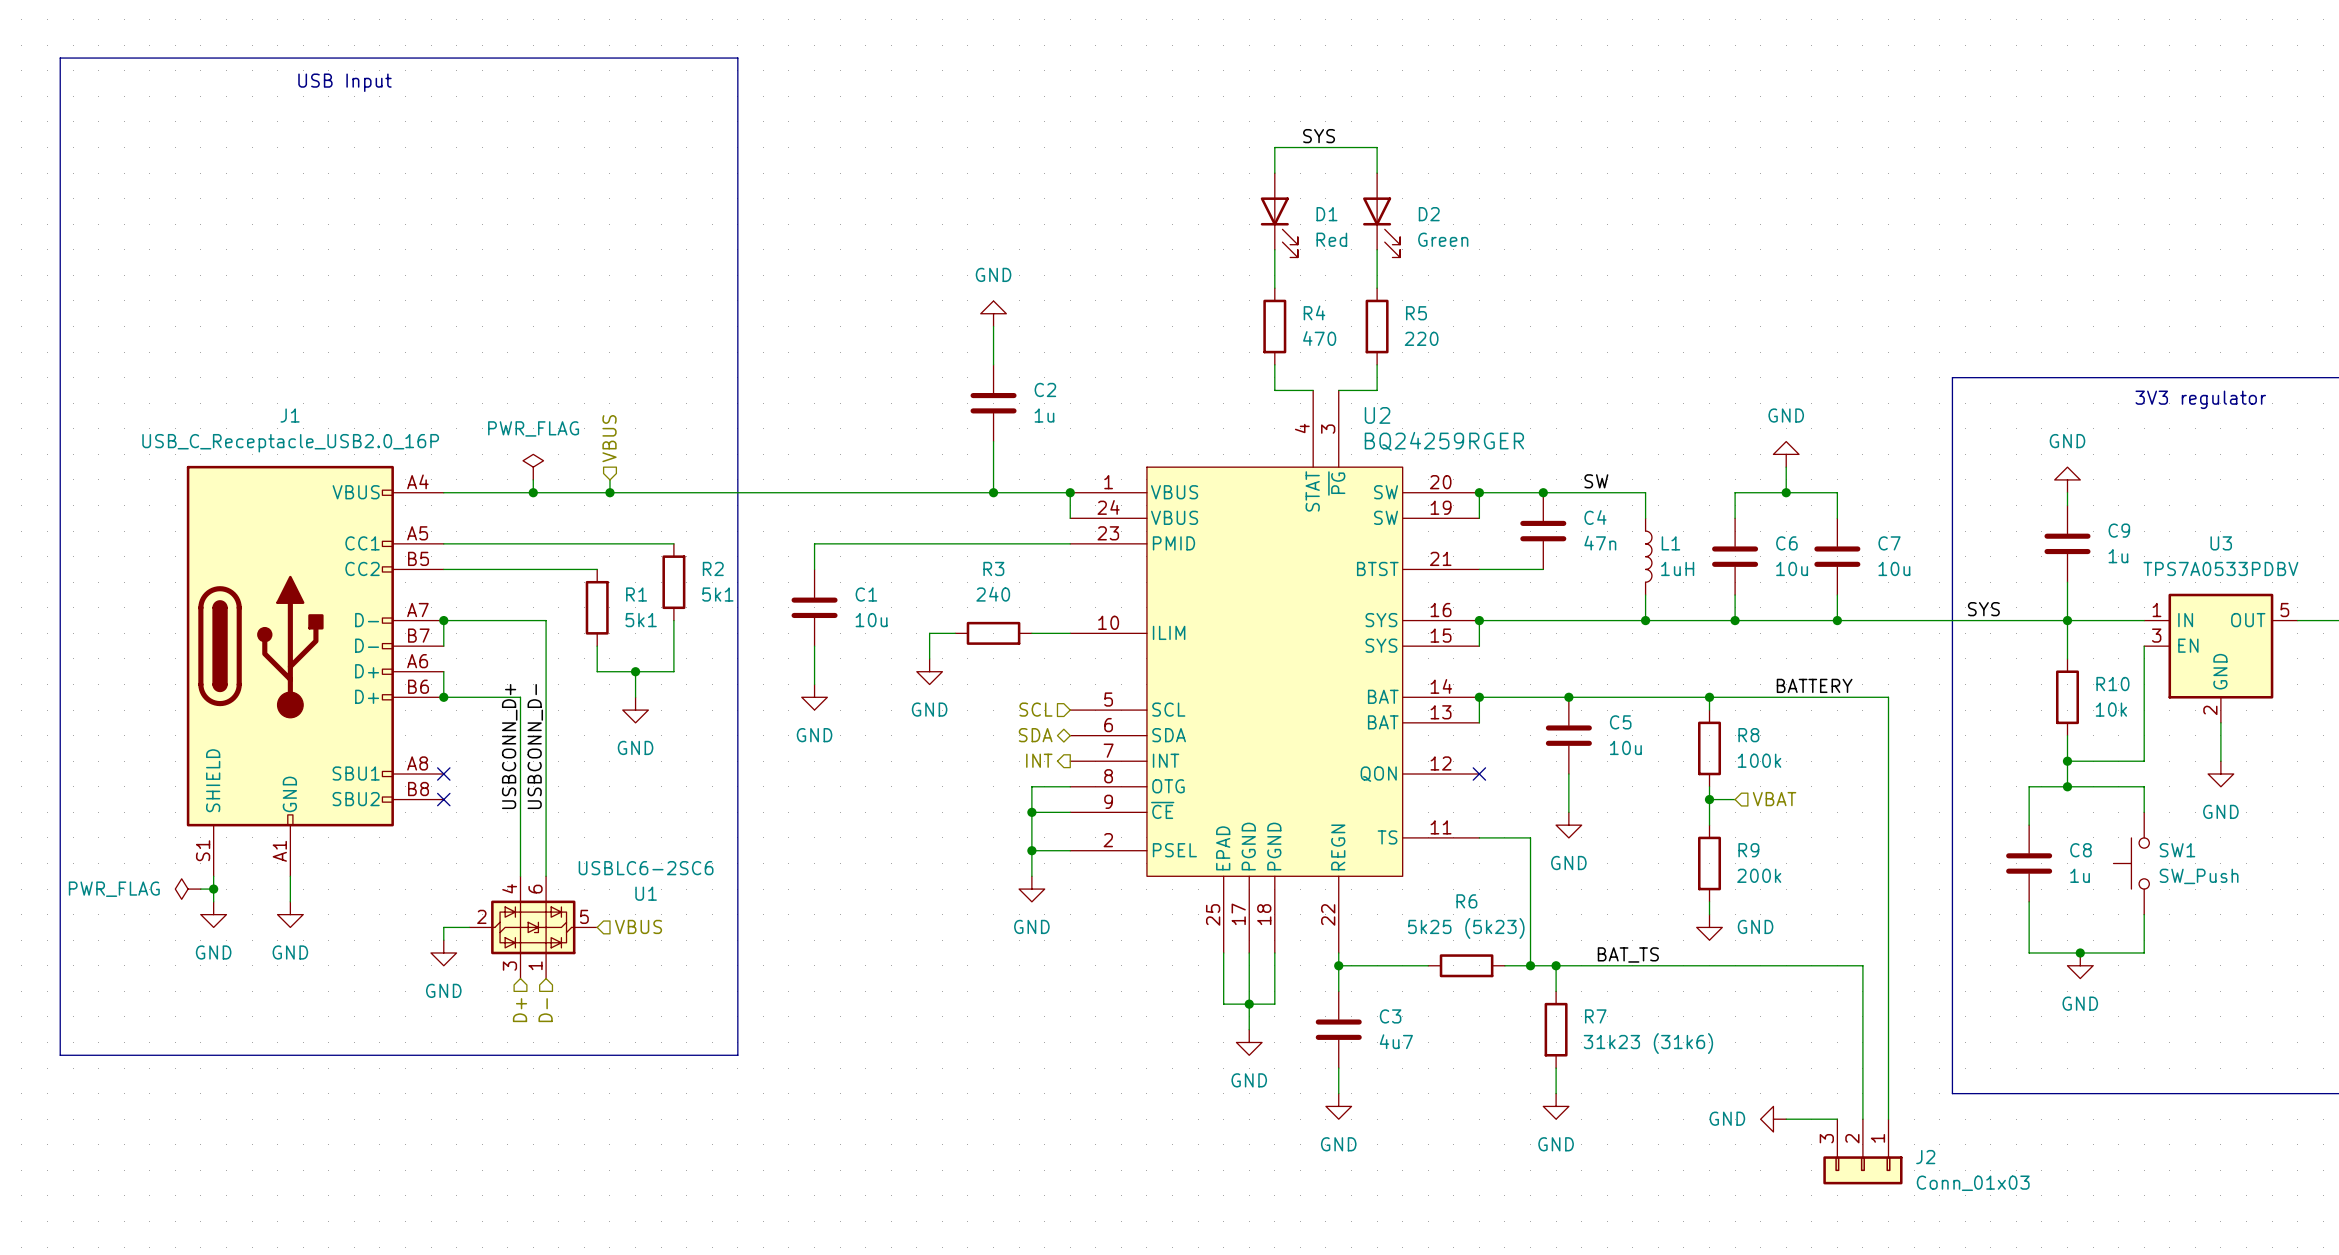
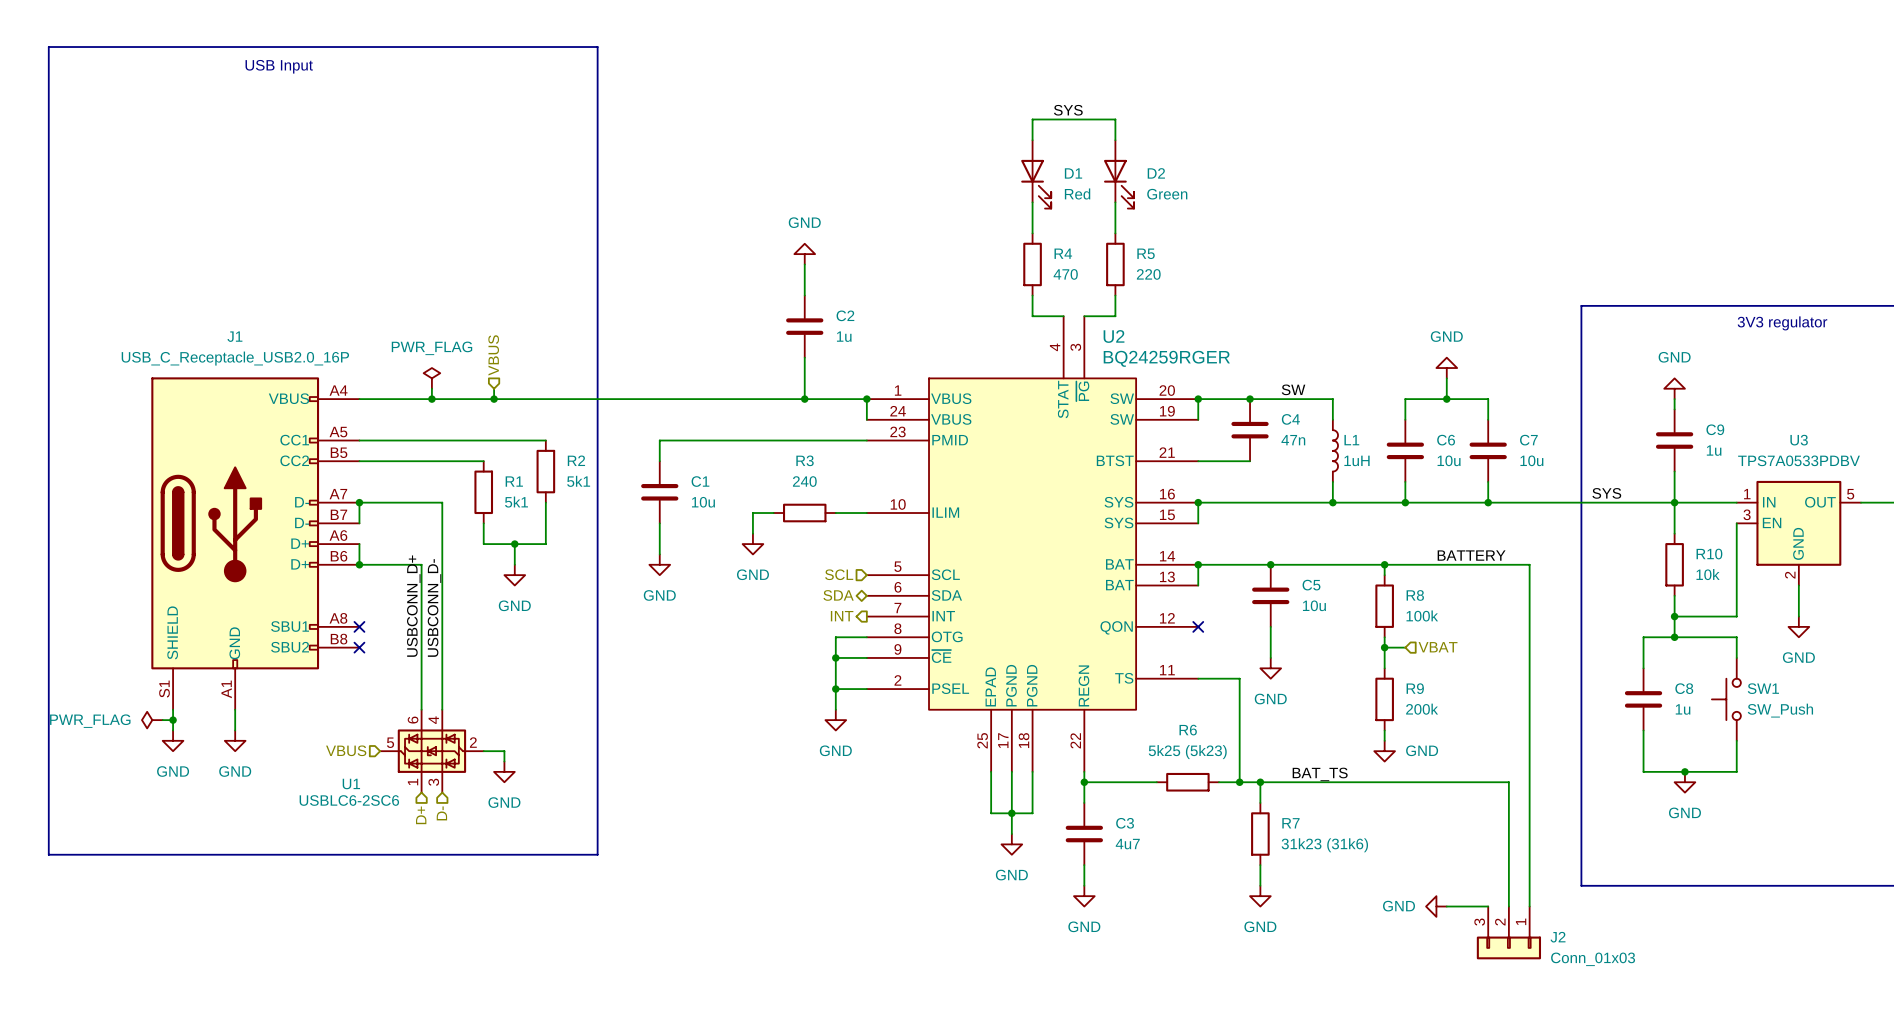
U1 value position: USBLC6-2SC6 (646, 868) -> USBLC6-2SC6 (349, 800)
U1 name position: U1 (646, 893) -> U1 (351, 784)
hierarchical label rotation: 0° (638, 926) -> 180° (346, 750)
hierarchical label position: VBUS (638, 926) -> VBUS (346, 750)
wire: (469, 927) (443, 927) (443, 940) -> none
U1 flip: as is (533, 927) -> left-right (431, 751)
wire: none -> (483, 751) (504, 751) (504, 761)
power symbol position: GND (443, 952) -> GND (504, 771)

